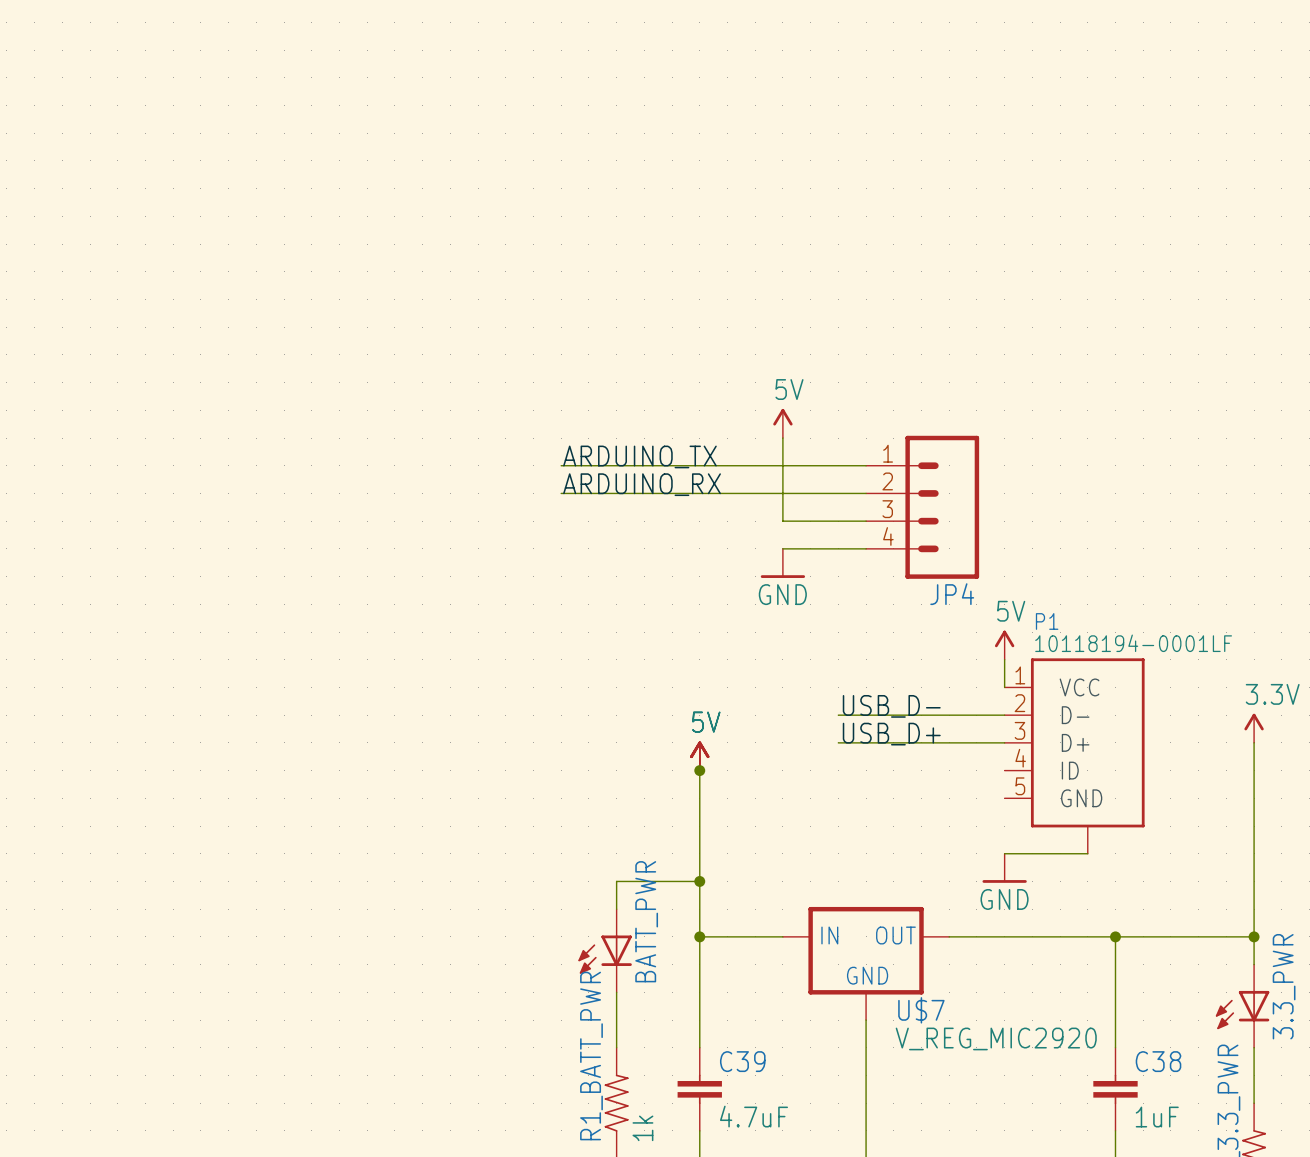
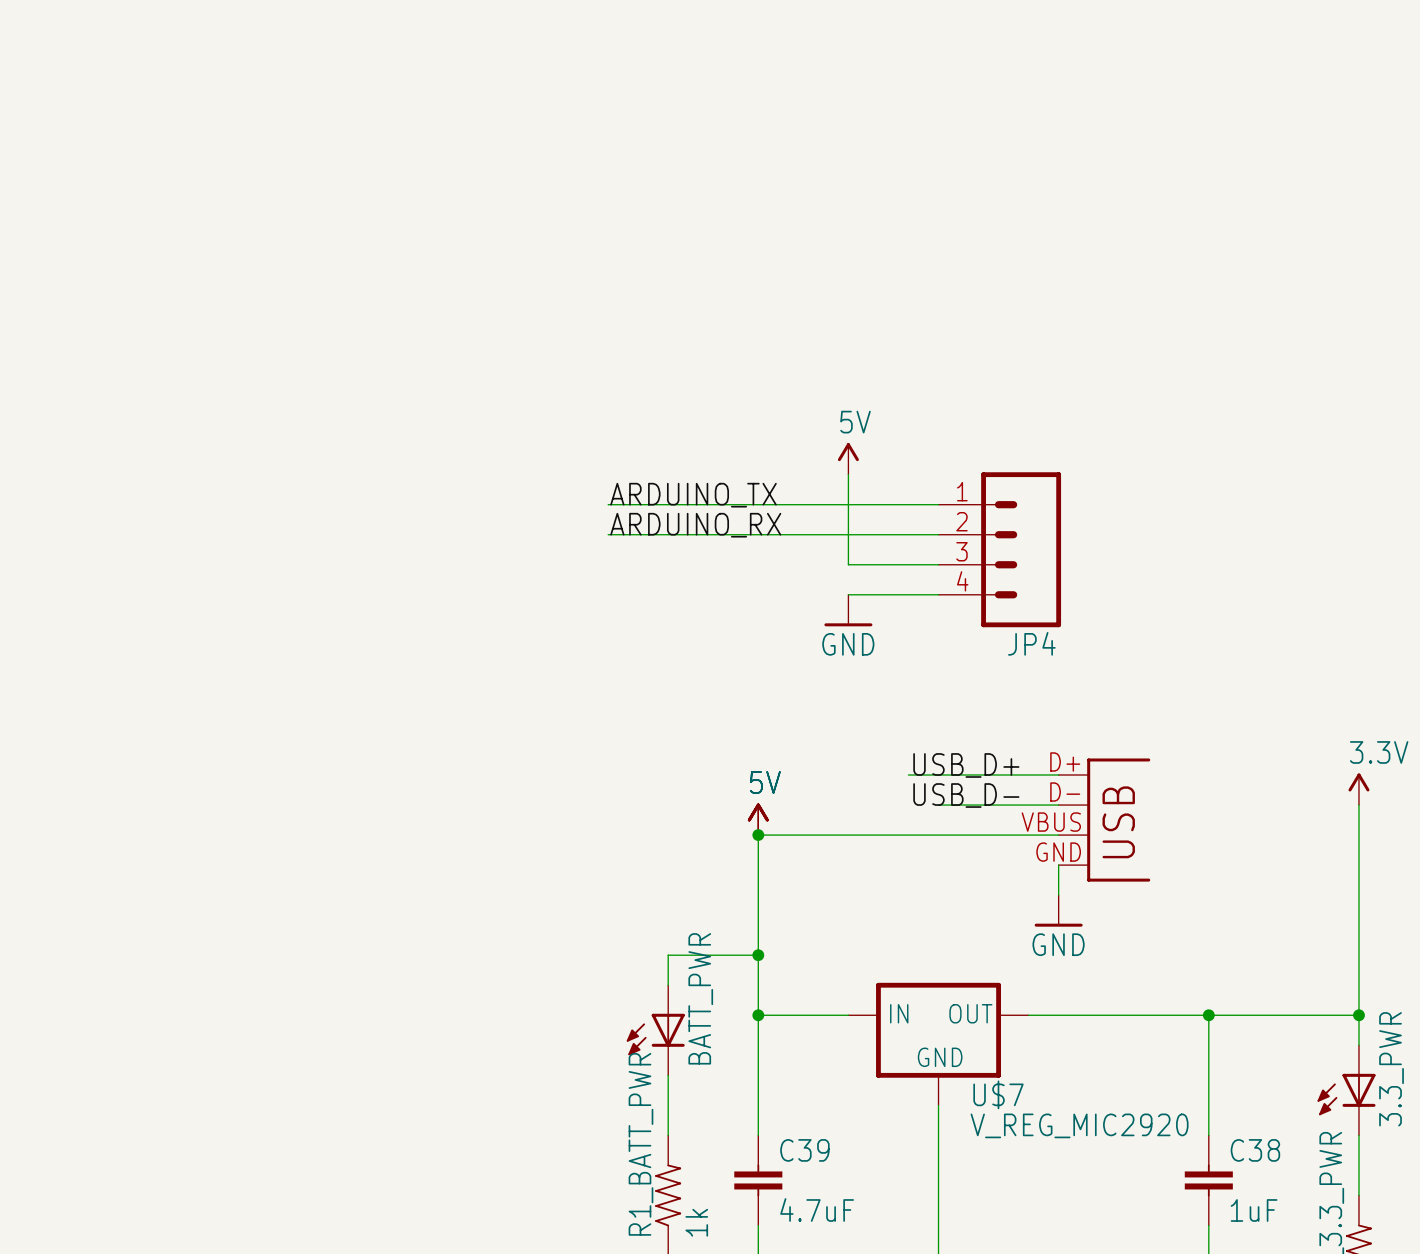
power symbol: 5V (1004, 645) -> none
wire: (1004, 659) (1004, 687) -> (1058, 865) (1058, 895)
label: USB_D- (891, 706) -> USB_D+ (966, 765)
label: USB_D+ (891, 734) -> USB_D- (966, 795)
wire: (838, 742) (866, 742) -> none
part: none -> (1104, 820)
P1: 10118194-0001LF (1074, 756) -> none
wire: none -> (758, 835) (1058, 835)
wire: (1004, 853) (1087, 853) -> none
power symbol position: GND (1004, 868) -> GND (1058, 910)

